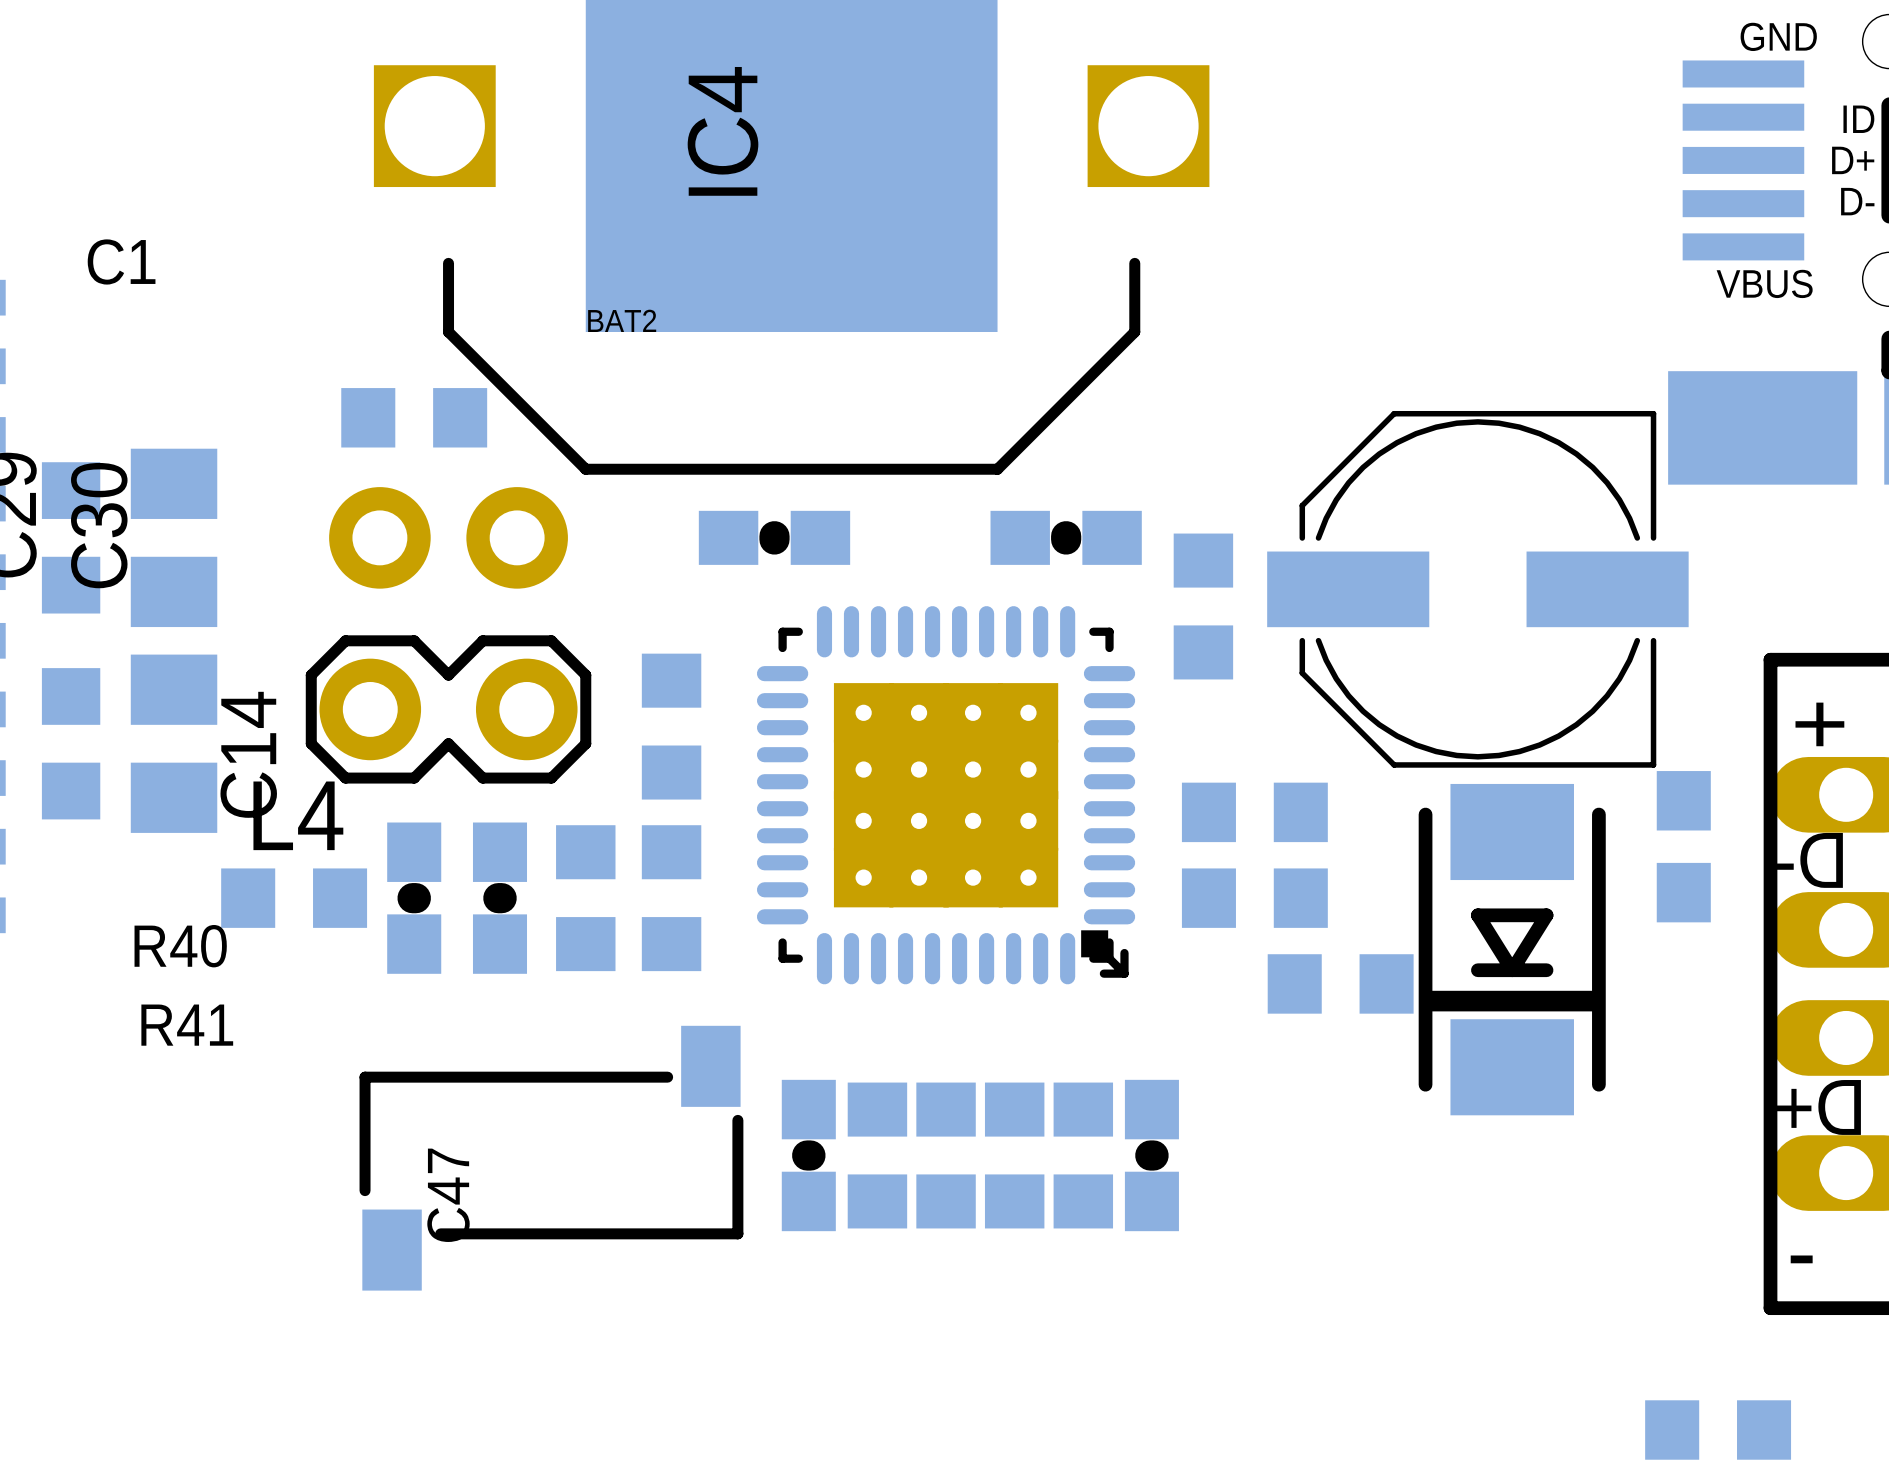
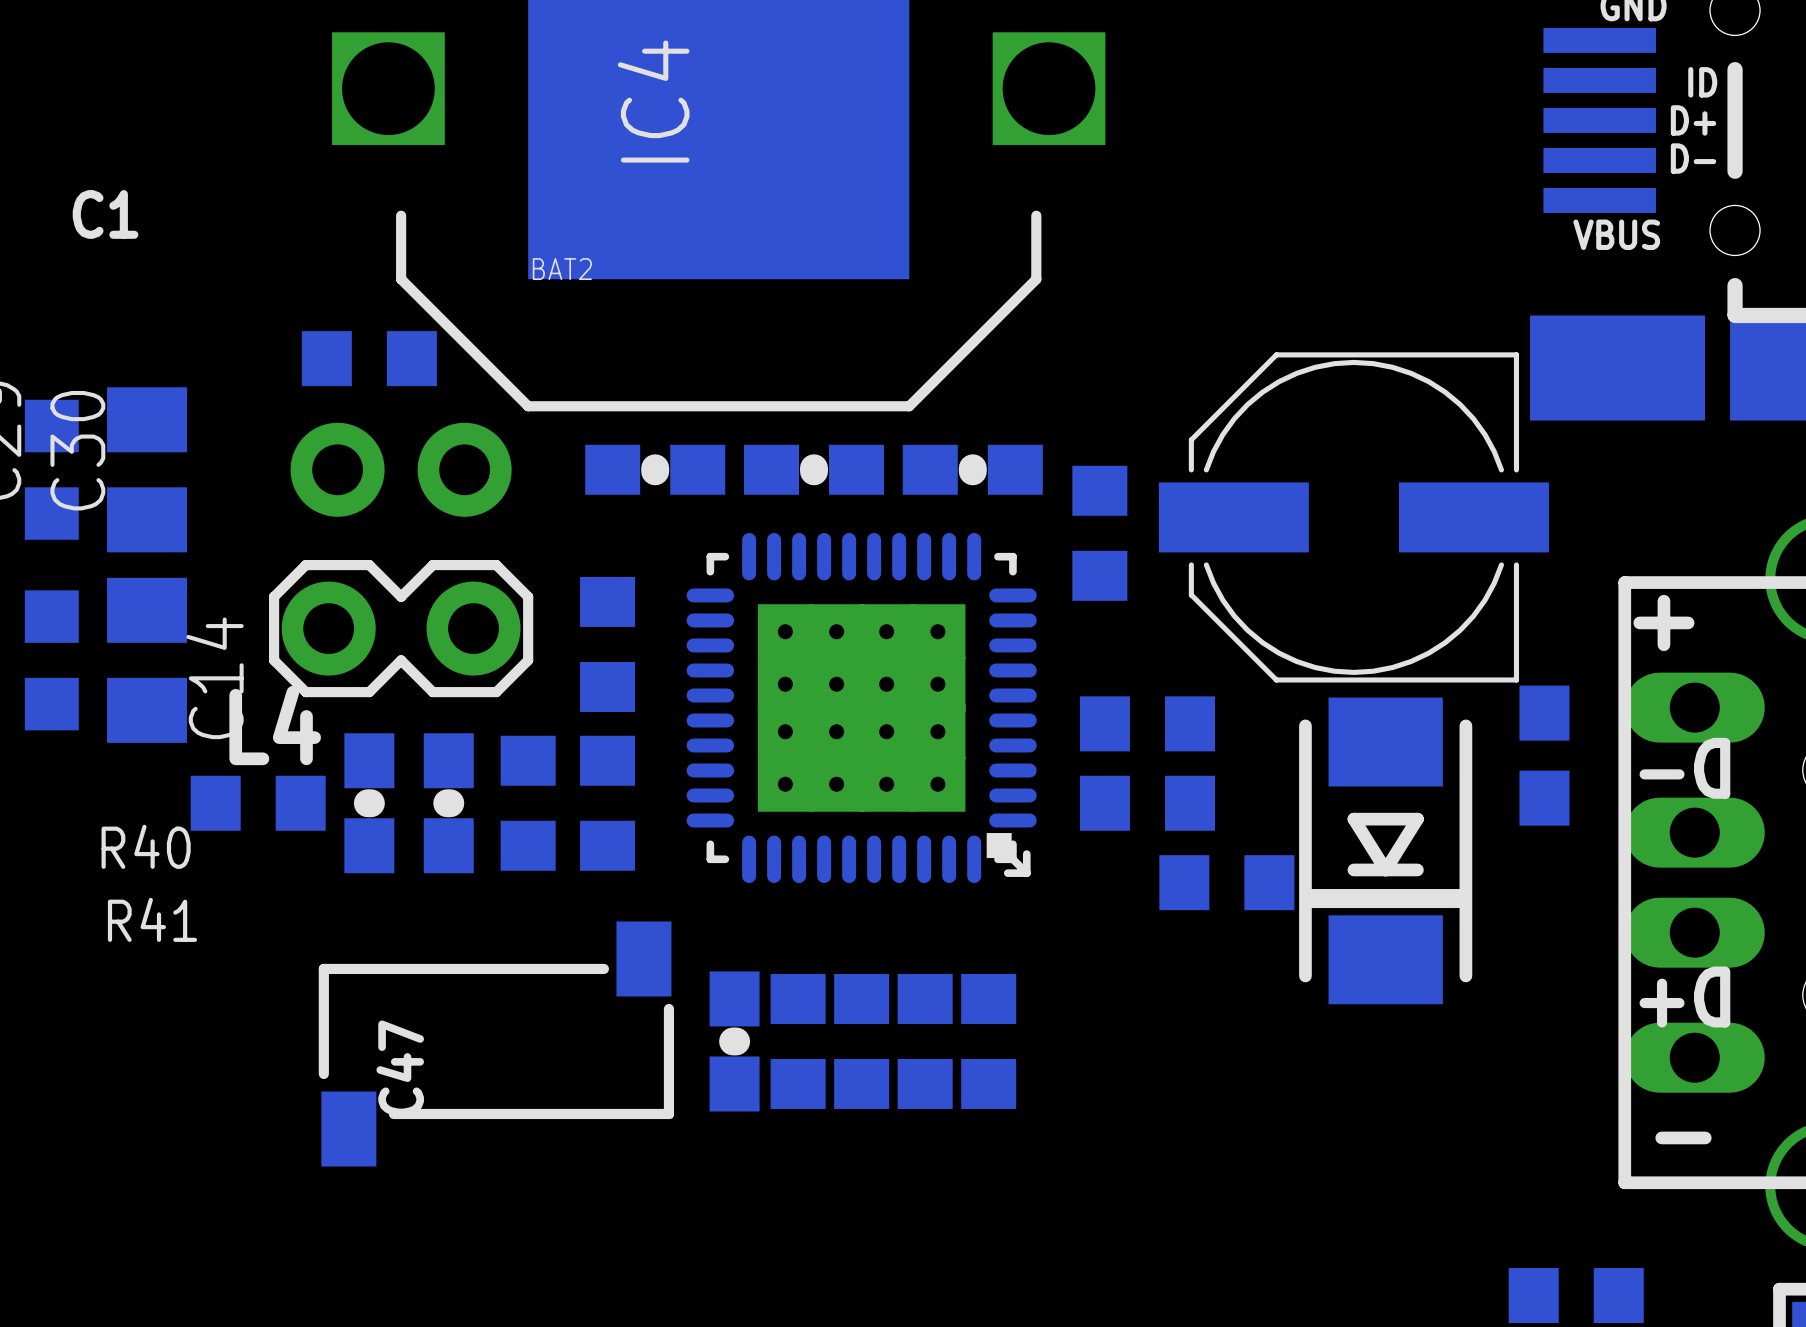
part position: (774, 537) -> (655, 469)
part rotation: 0° (1151, 1155) -> 90° clockwise (814, 469)
part position: (1151, 1155) -> (814, 469)

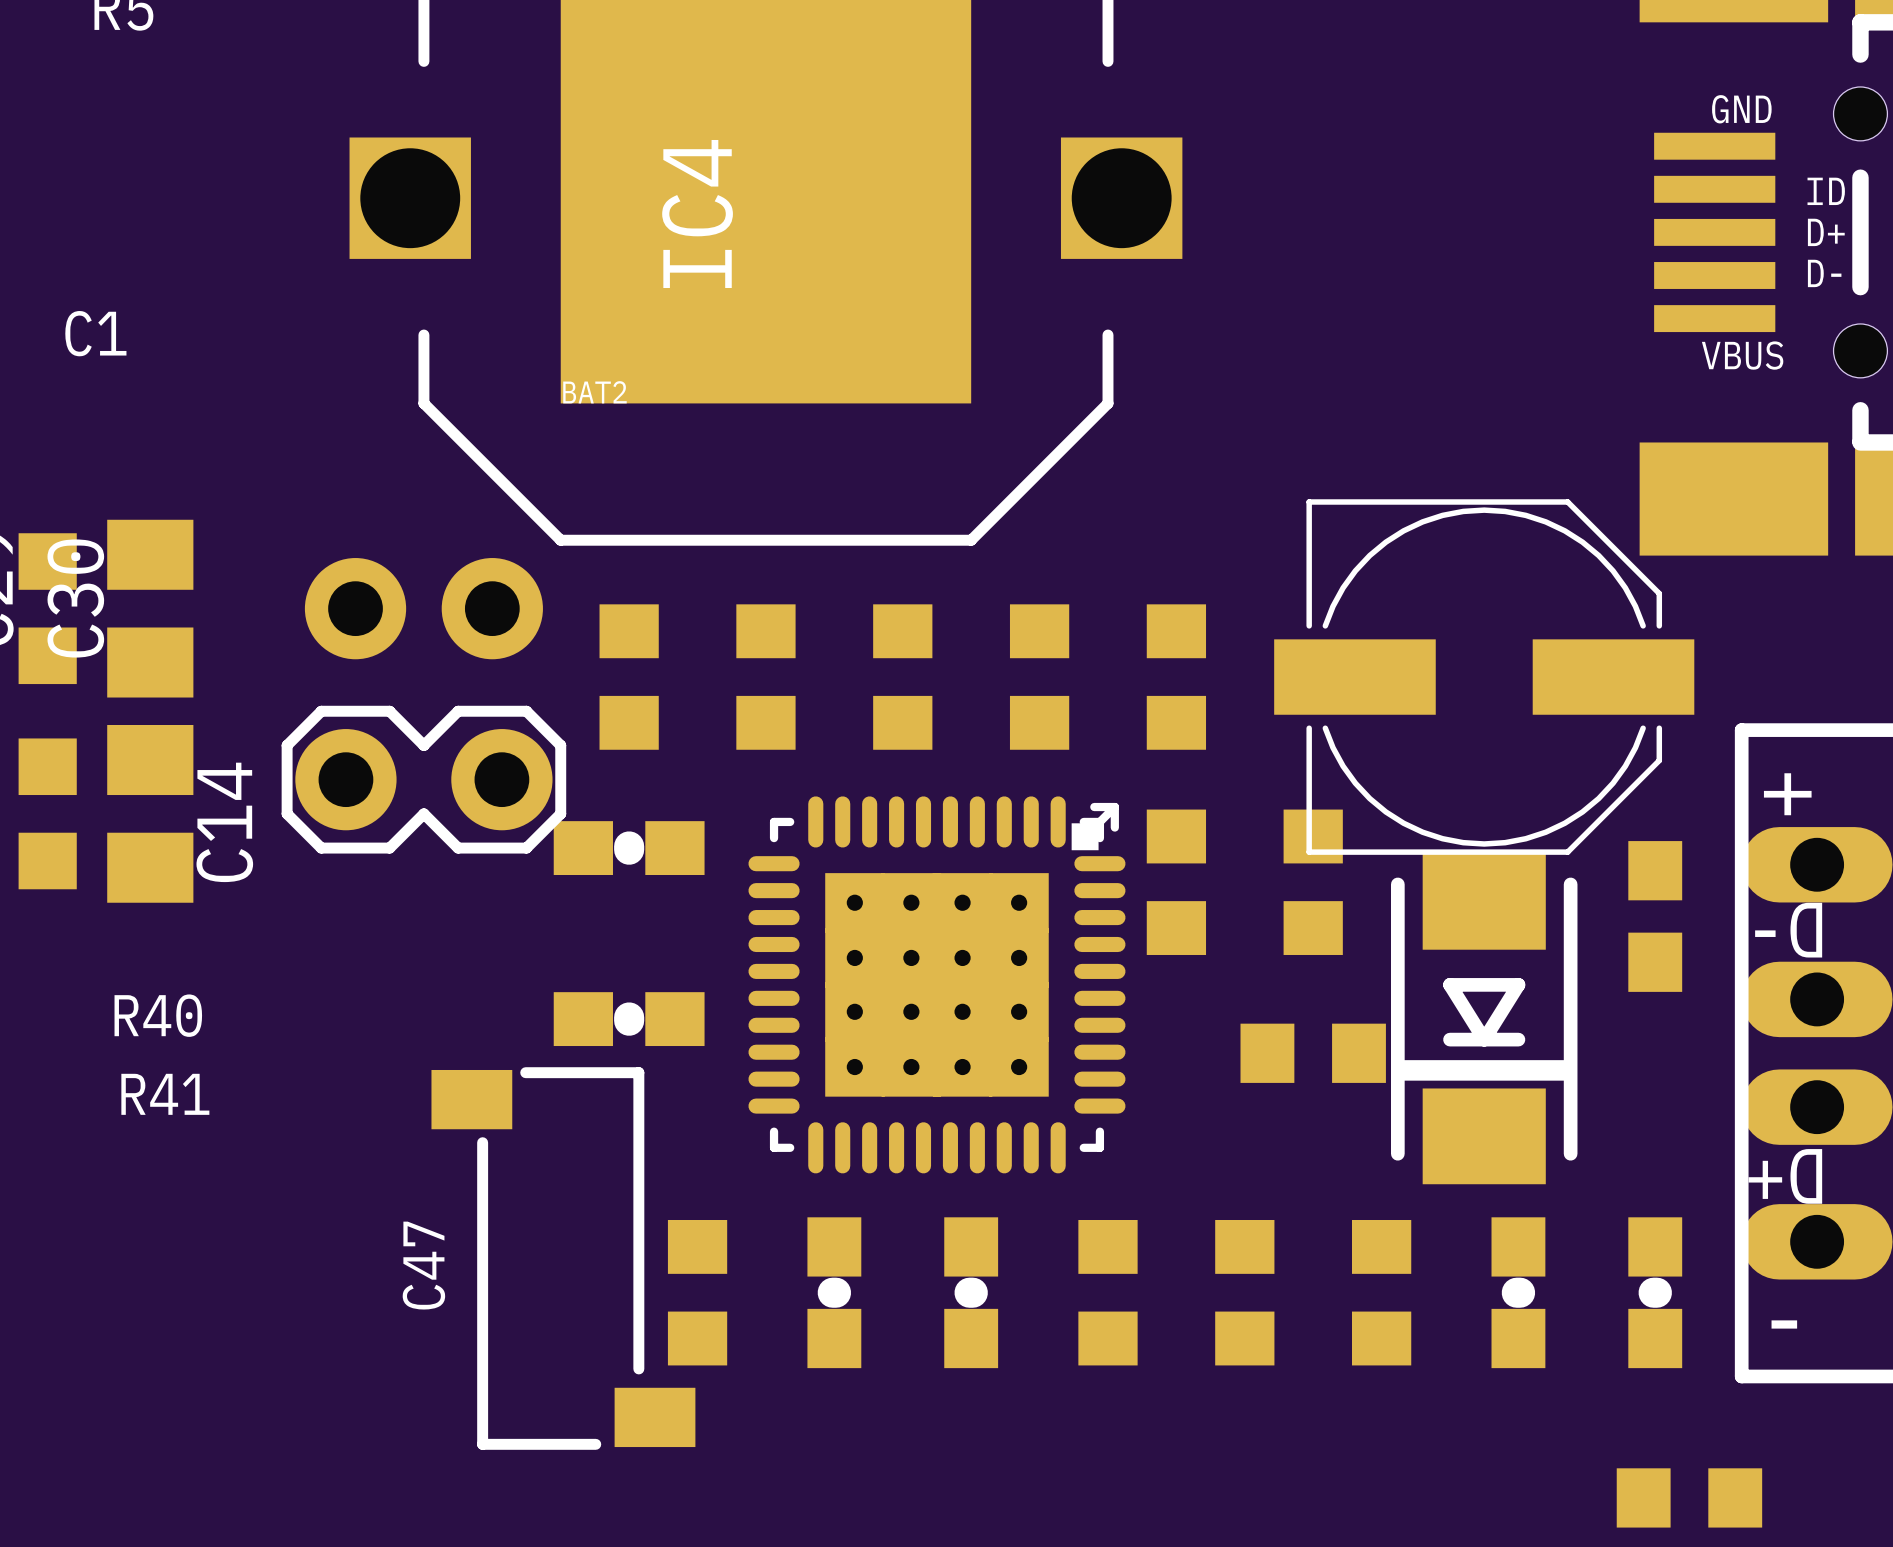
part: (369, 358) -> none
part: (655, 469) -> none
part: (814, 469) -> none
part: (972, 469) -> none
part rotation: 0° (1353, 517) -> 180° (1484, 677)
part: none -> (629, 677)
part: none -> (765, 677)
part: none -> (902, 677)
part: none -> (1039, 677)
part: (607, 644) -> none
part: none -> (629, 848)
part rotation: 0° (861, 707) -> 90° counterclockwise (936, 984)
part: none -> (1176, 882)
part: (1147, 723) -> none
part: none -> (1313, 882)
L4: (258, 803) -> none
part: (369, 803) -> none
part: (448, 803) -> none
part: (528, 803) -> none
part: (607, 803) -> none
part: (1147, 803) -> none
part: none -> (629, 1019)
part position: (734, 1041) -> (834, 1292)
part: (798, 1041) -> none
part: (861, 1041) -> none
part: (925, 1041) -> none
part: (988, 1041) -> none
part rotation: 0° (496, 1043) -> 90° counterclockwise (563, 1258)
part: none -> (697, 1292)
part: none -> (971, 1292)
part: none -> (1107, 1292)
part: none -> (1244, 1292)
part: none -> (1381, 1292)
part: none -> (1518, 1292)
part: none -> (1655, 1292)

